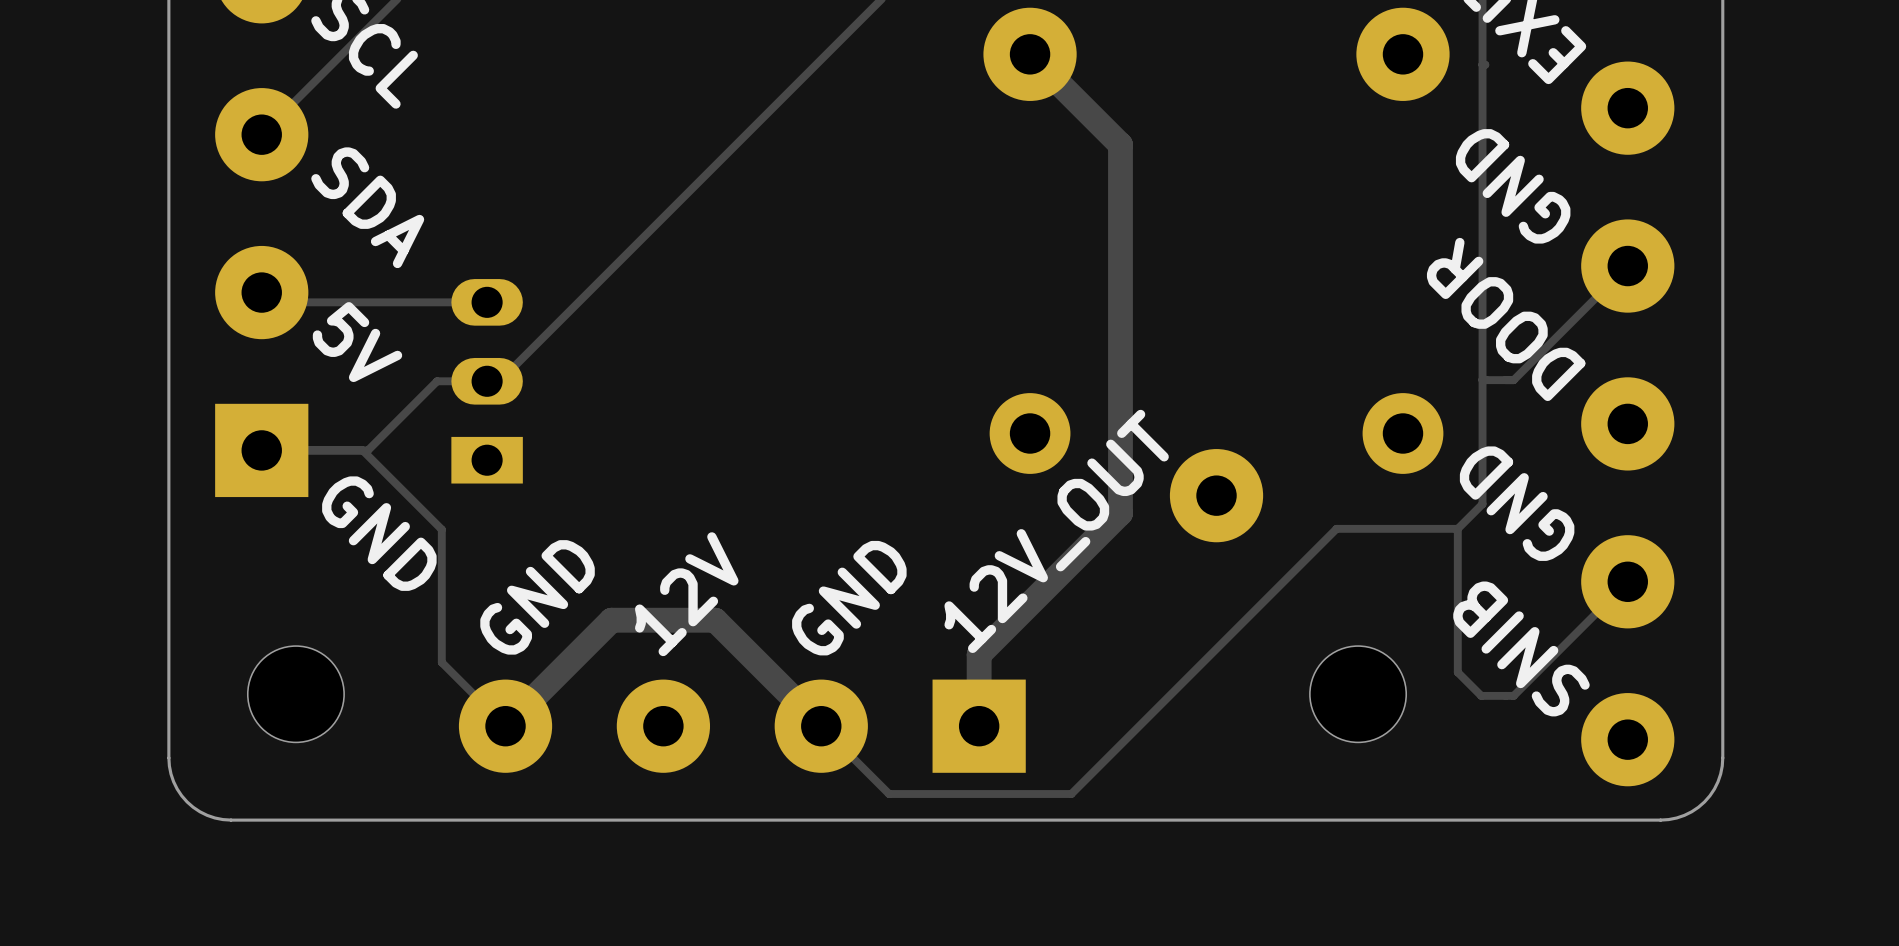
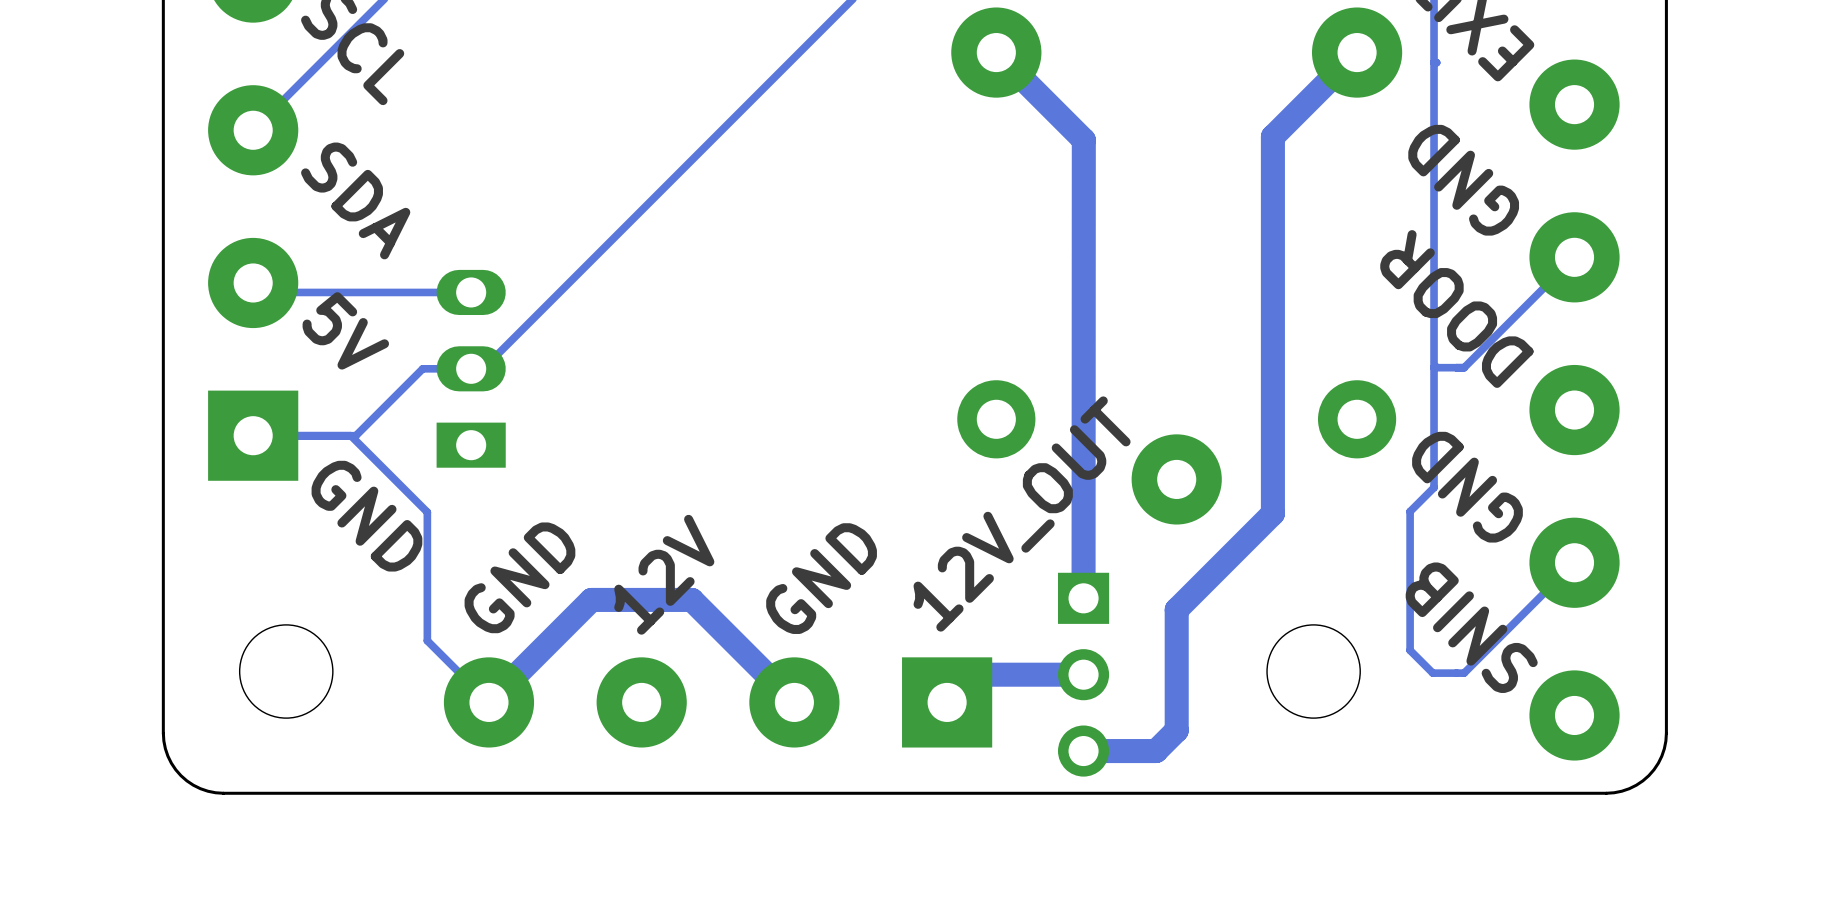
track: none -> (1357, 52) (1272, 136) (1272, 513) (1176, 609) (1176, 730) (1156, 751) (1083, 751)
track: (1120, 144) (1120, 513) (979, 654) (979, 726) -> (1083, 140) (1083, 598)
track: (1457, 528) (1336, 528) (1071, 794) (889, 794) (821, 726) -> none
track: none -> (1083, 674) (974, 674) (947, 702)
part: none -> (1083, 674)

